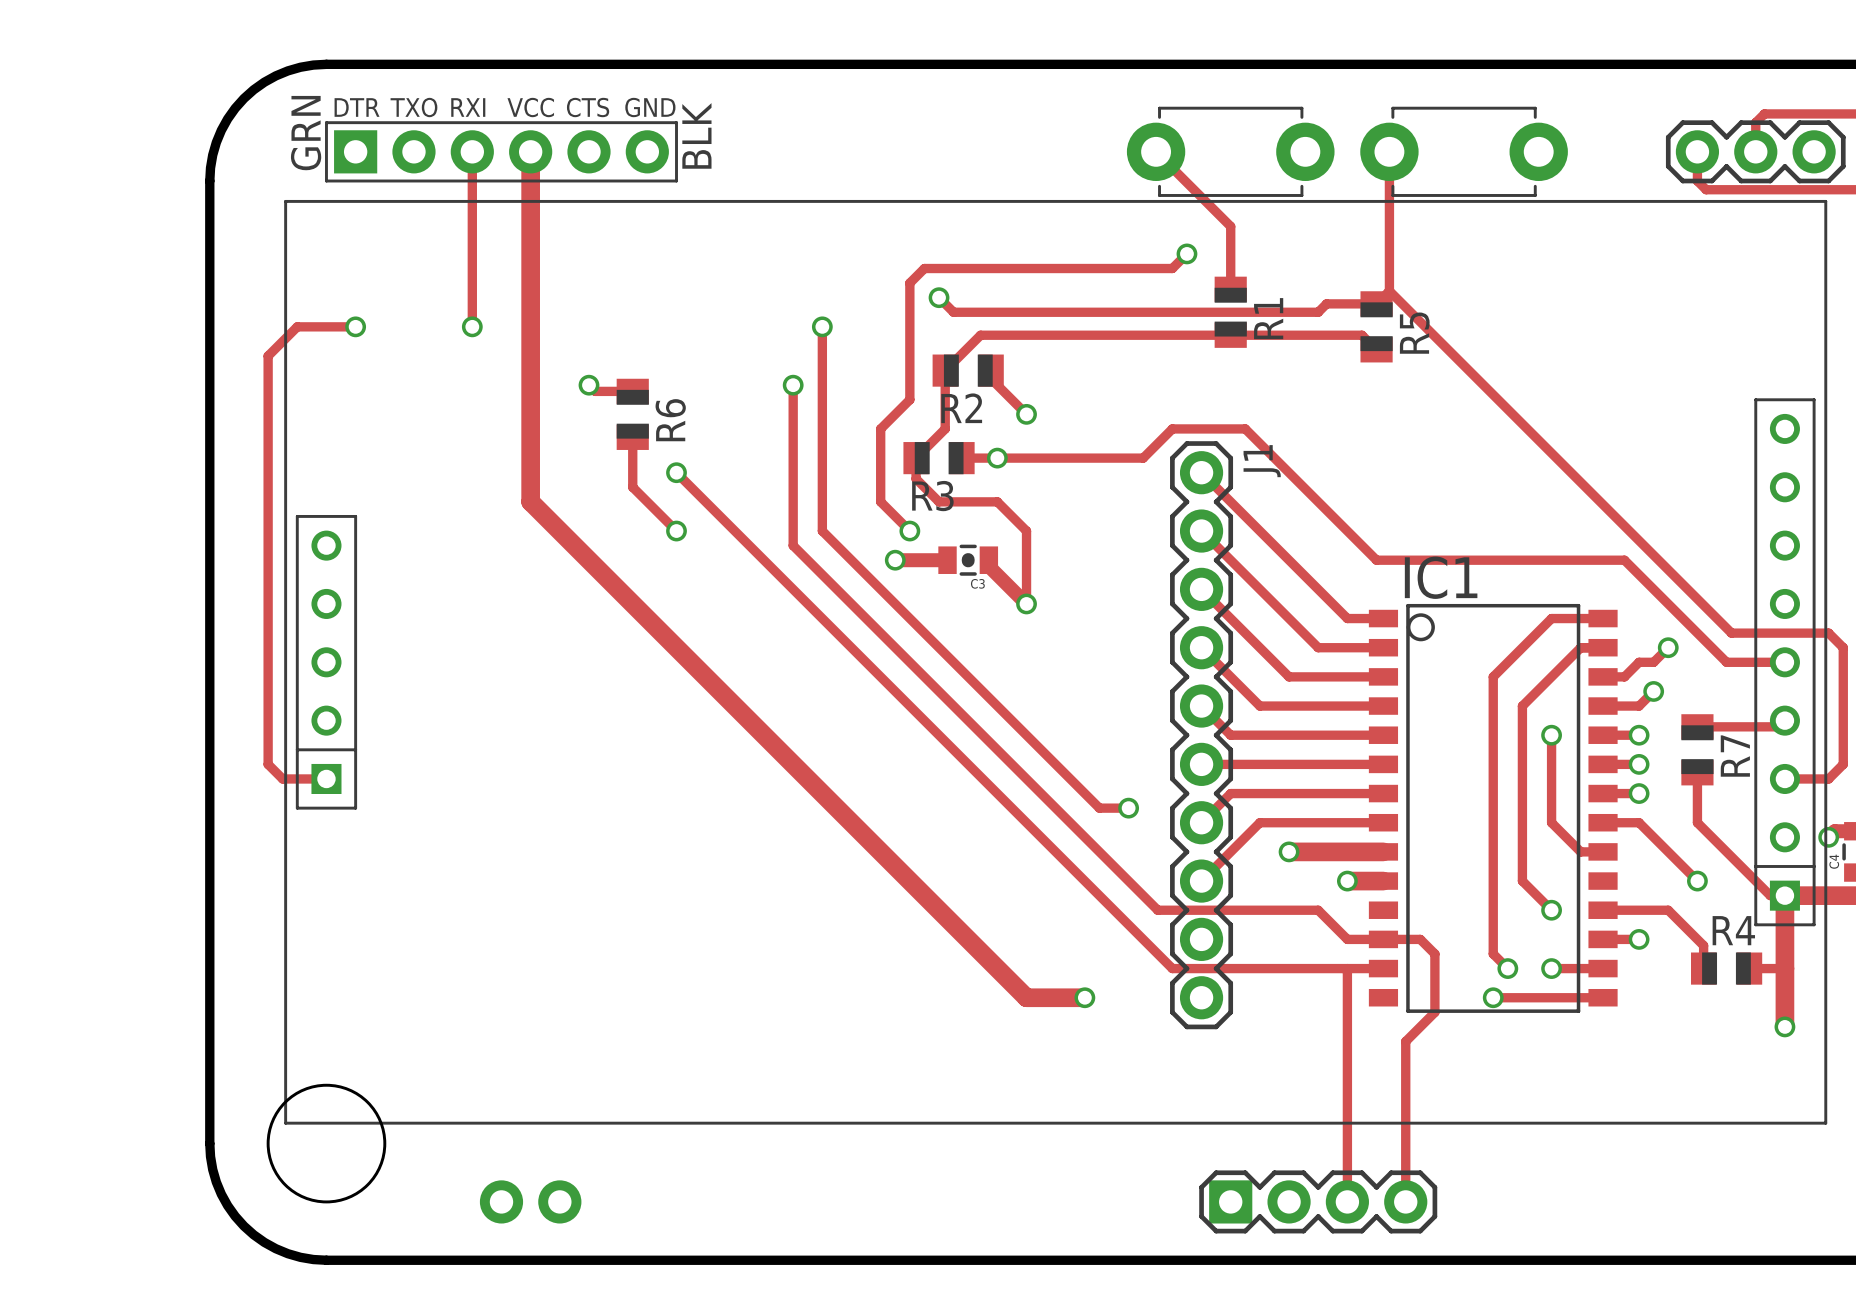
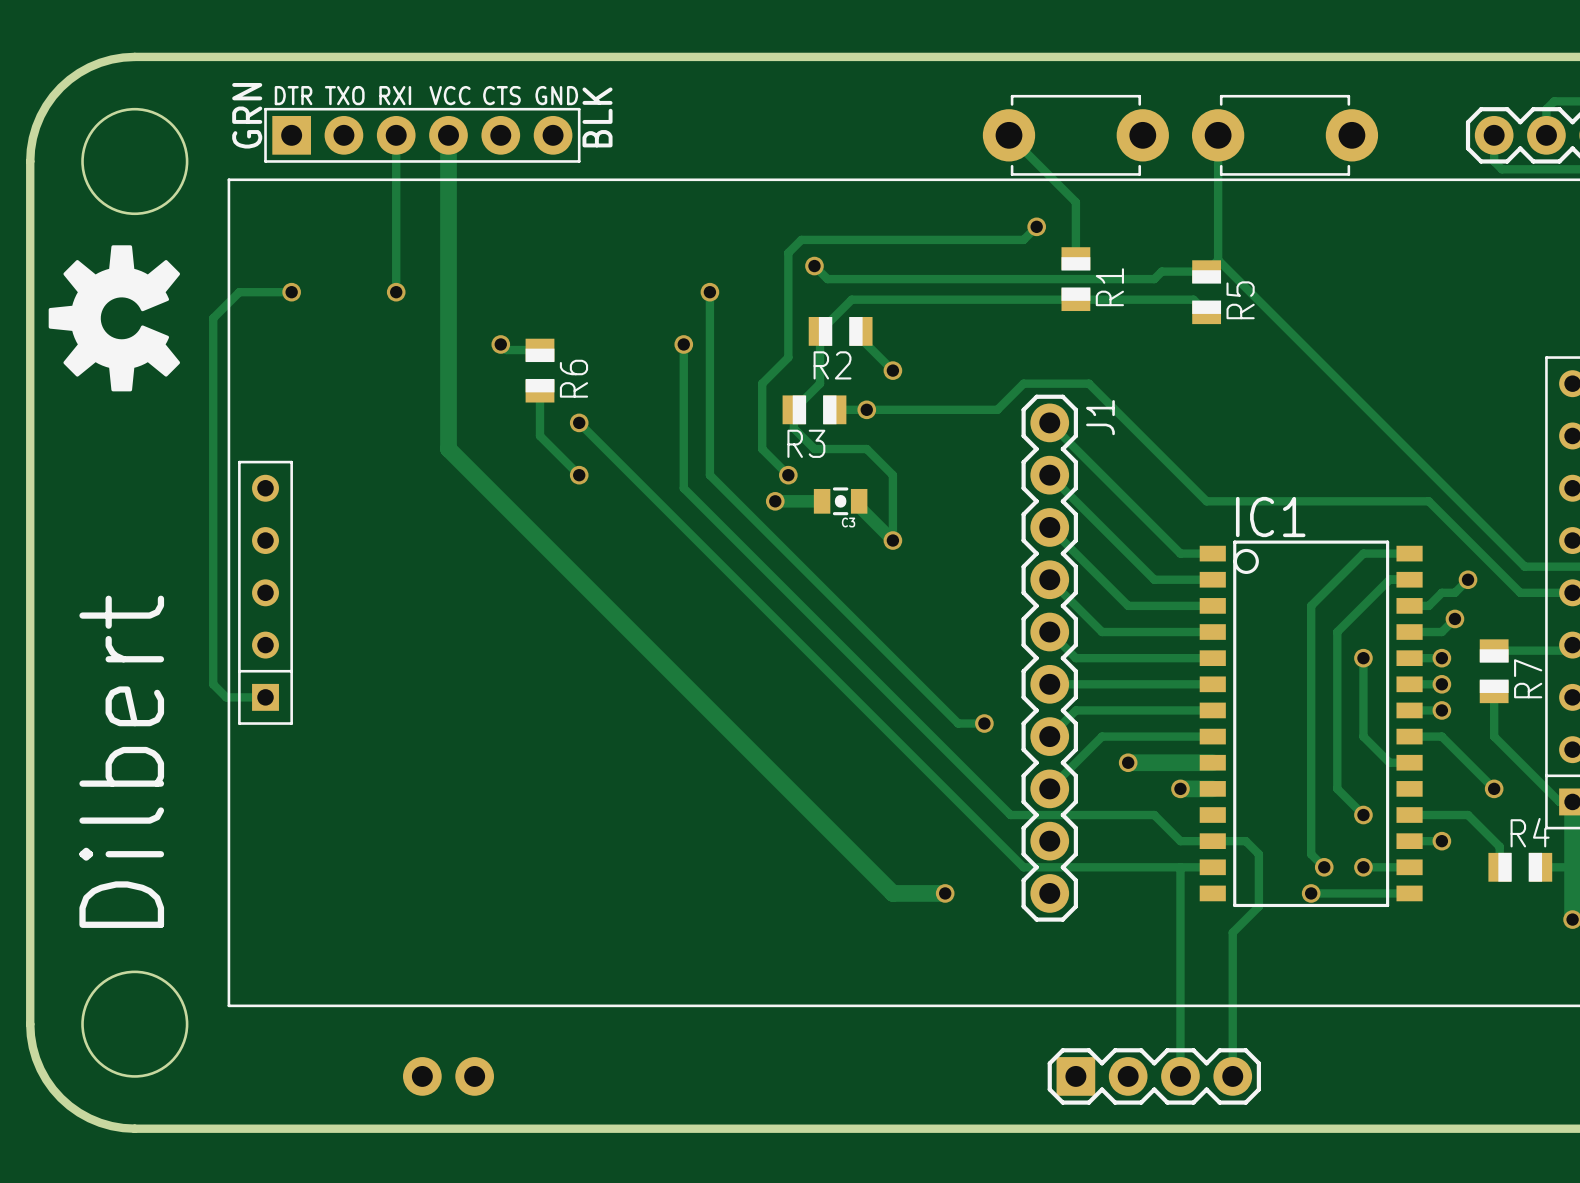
board edge: (326, 64) (300, 67) (275, 75) (243, 98) (221, 130) (212, 155) (209, 181) (210, 1156) (221, 1194) (243, 1226) (275, 1248) (300, 1257) (326, 1260) -> (265, 56) (123, 57) (89, 67) (60, 87) (46, 105) (32, 138) (30, 161) (30, 1024) (32, 1047) (46, 1079) (60, 1098) (79, 1112) (100, 1122) (134, 1128) (265, 1128)
drawing: none -> [81, 107, 189, 216]
drawing: none -> [48, 245, 181, 392]
text: none -> Dilbert (121, 761)
drawing position: (326, 1143) -> (134, 1024)

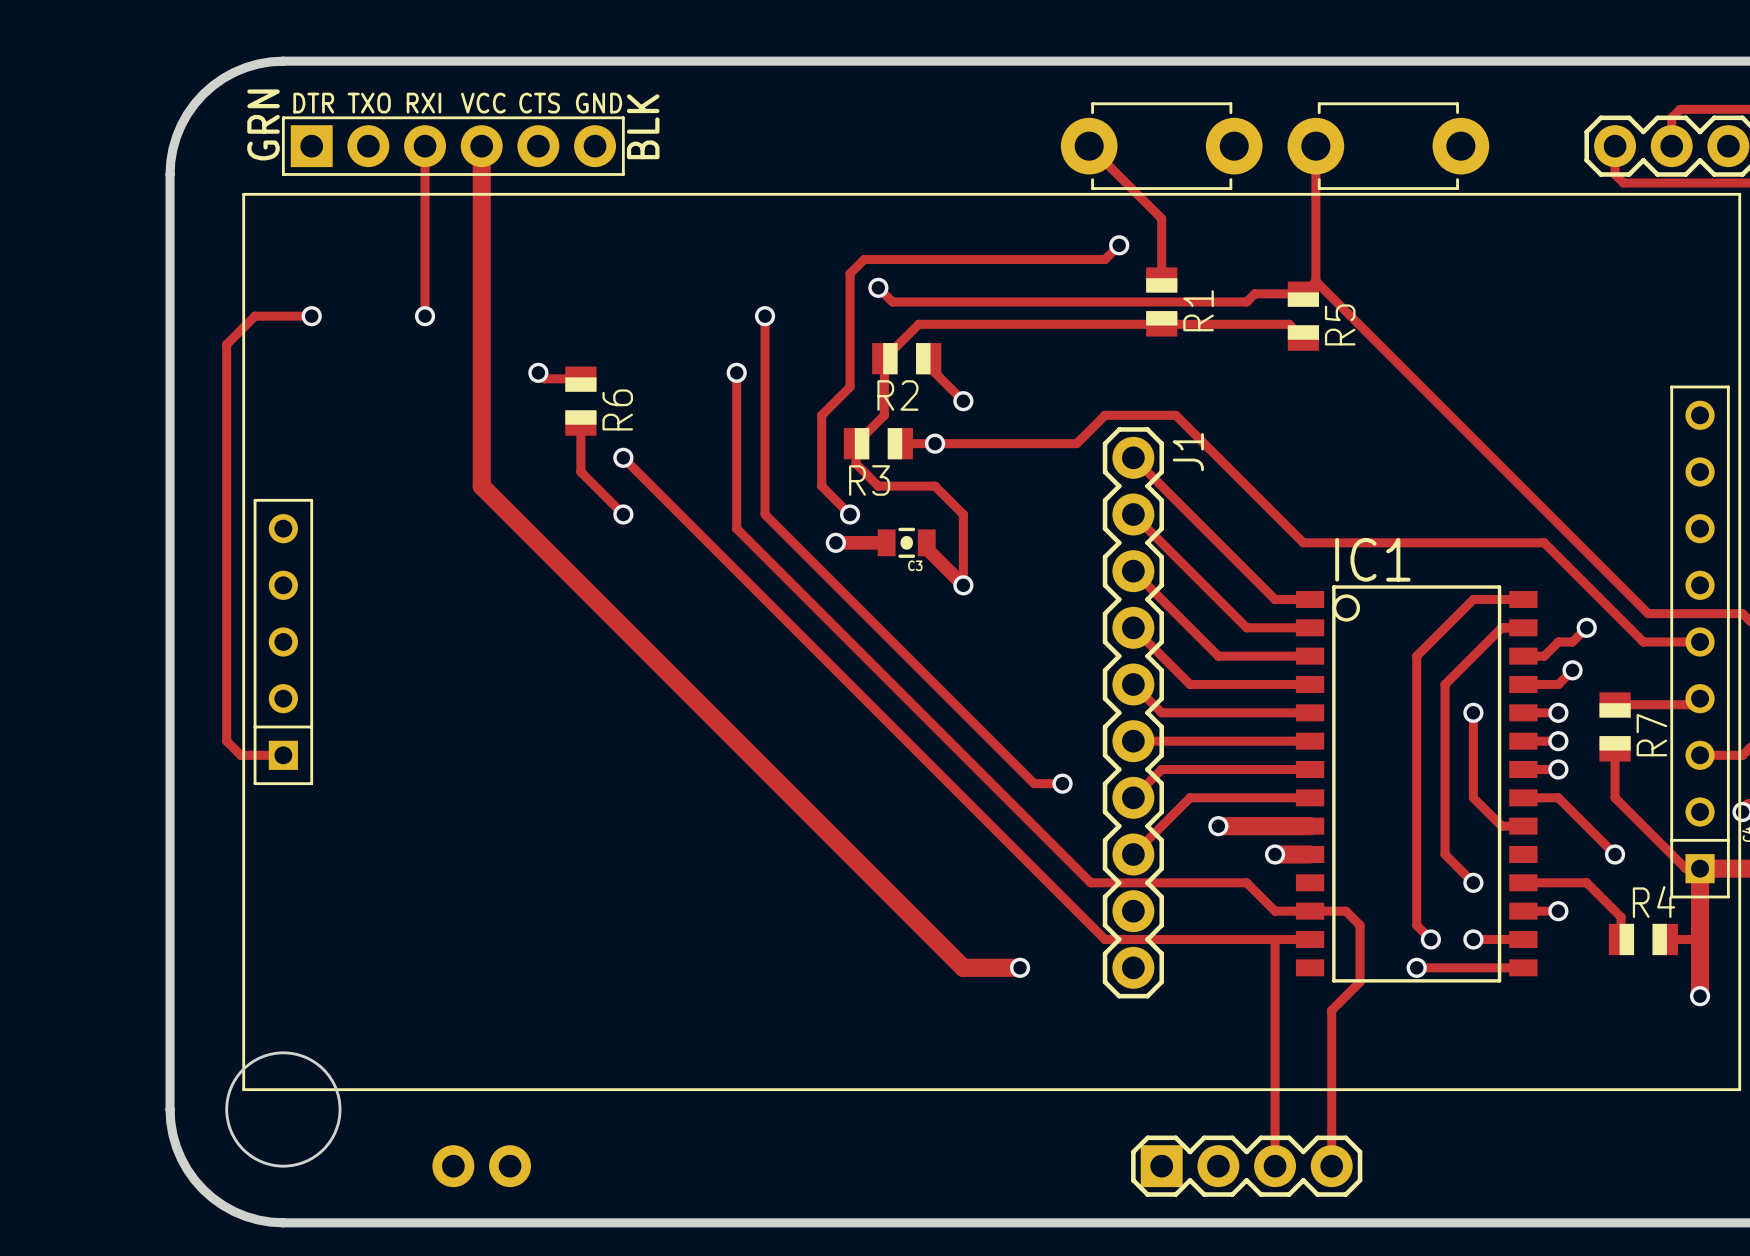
board edge: (265, 56) (123, 57) (89, 67) (60, 87) (46, 105) (32, 138) (30, 161) (30, 1024) (32, 1047) (46, 1079) (60, 1098) (79, 1112) (100, 1122) (134, 1128) (265, 1128) -> (283, 61) (258, 63) (234, 72) (203, 94) (181, 125) (172, 149) (170, 174) (170, 1122) (181, 1158) (203, 1189) (234, 1211) (258, 1219) (283, 1222)
drawing: [81, 107, 189, 216] -> none
drawing: [48, 245, 181, 392] -> none
text: Dilbert (121, 761) -> none
drawing position: (134, 1024) -> (283, 1109)

